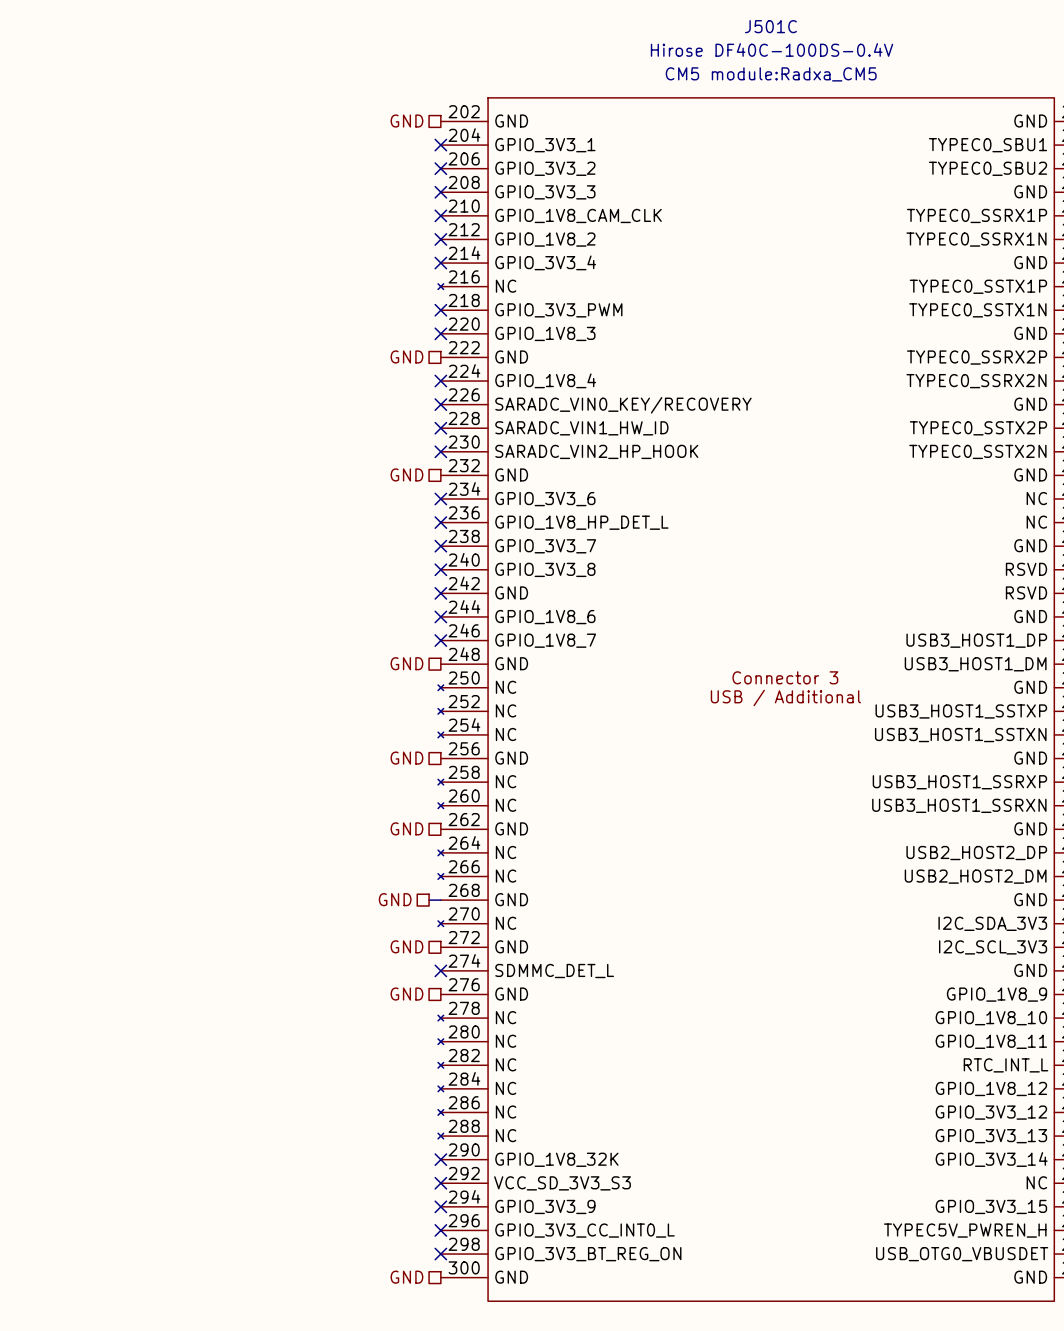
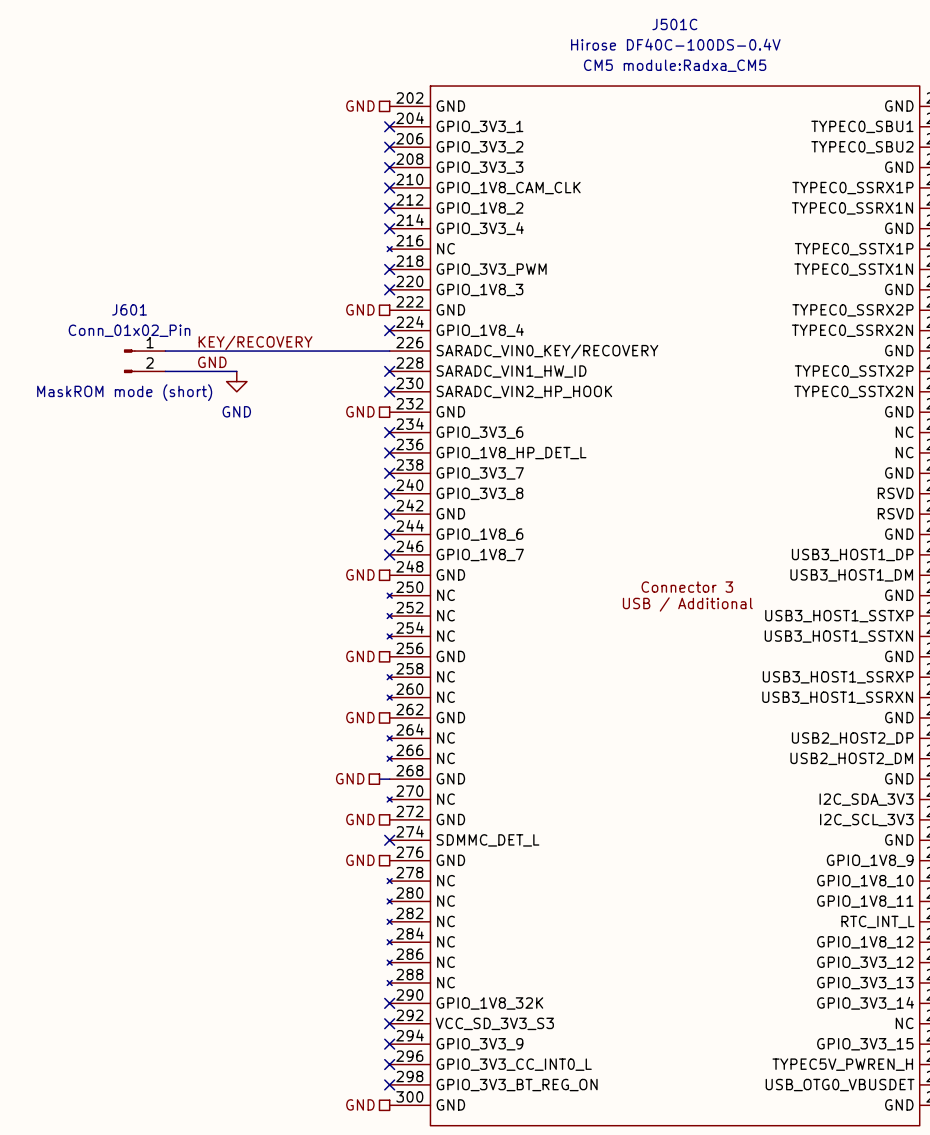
label: none -> KEY/RECOVERY (255, 342)
wire: none -> (165, 351) (389, 351)
no-connect mark: (440, 404) -> none
J601: none -> Conn_01x02_Pin (144, 361)
label: none -> GND (212, 362)
wire: none -> (165, 371) (236, 371)
power symbol: none -> GND (236, 381)

